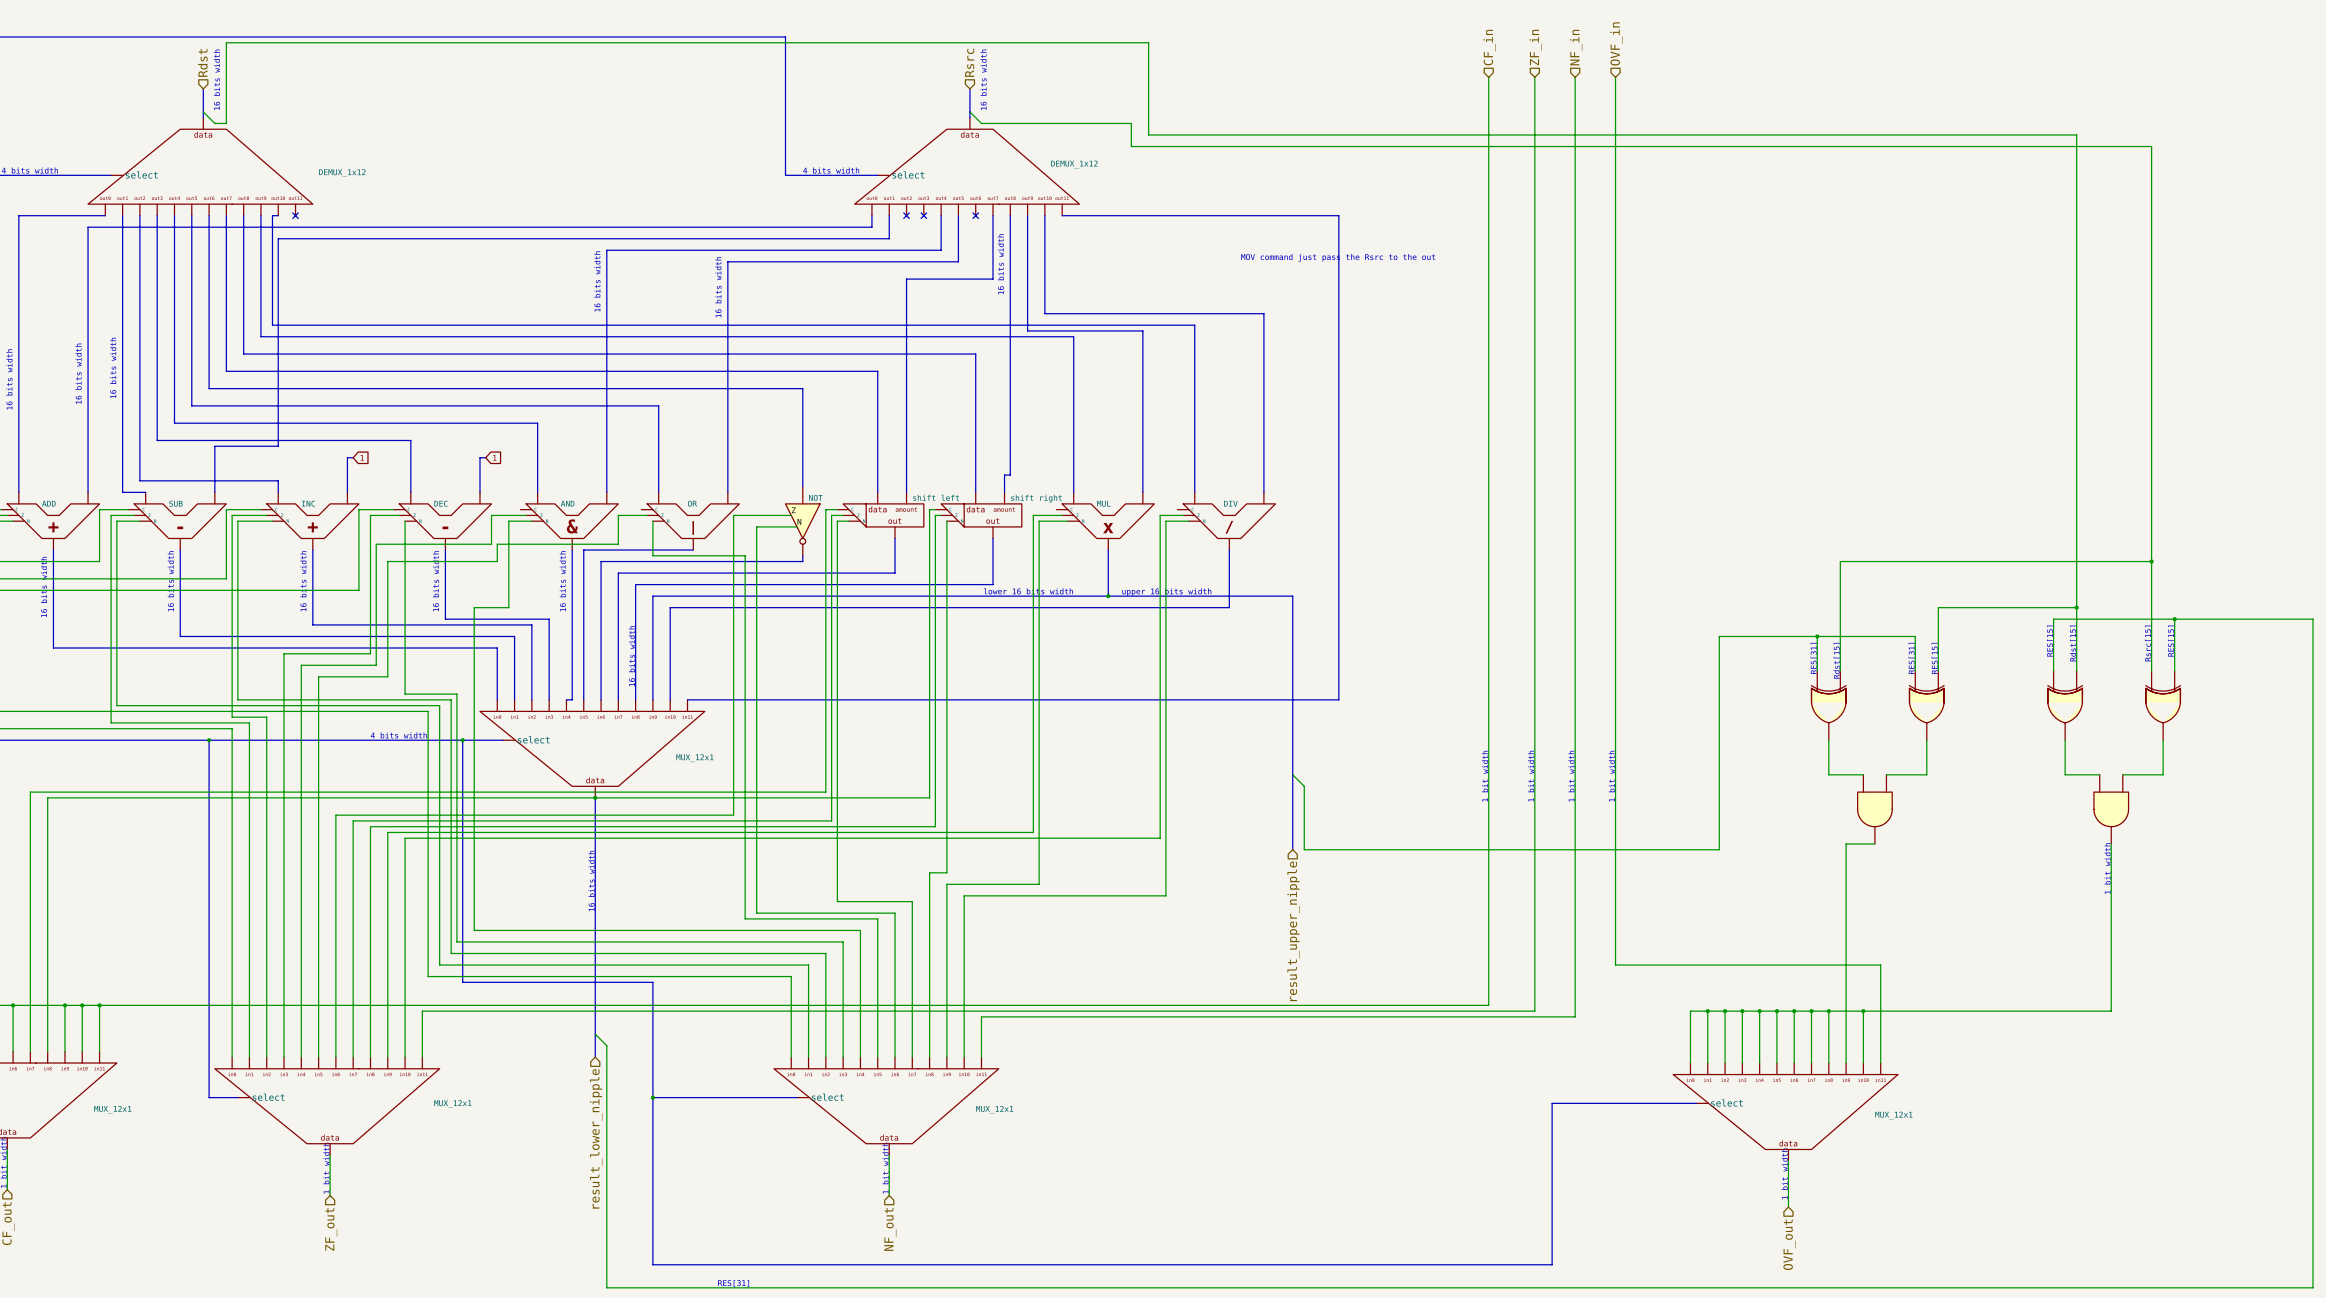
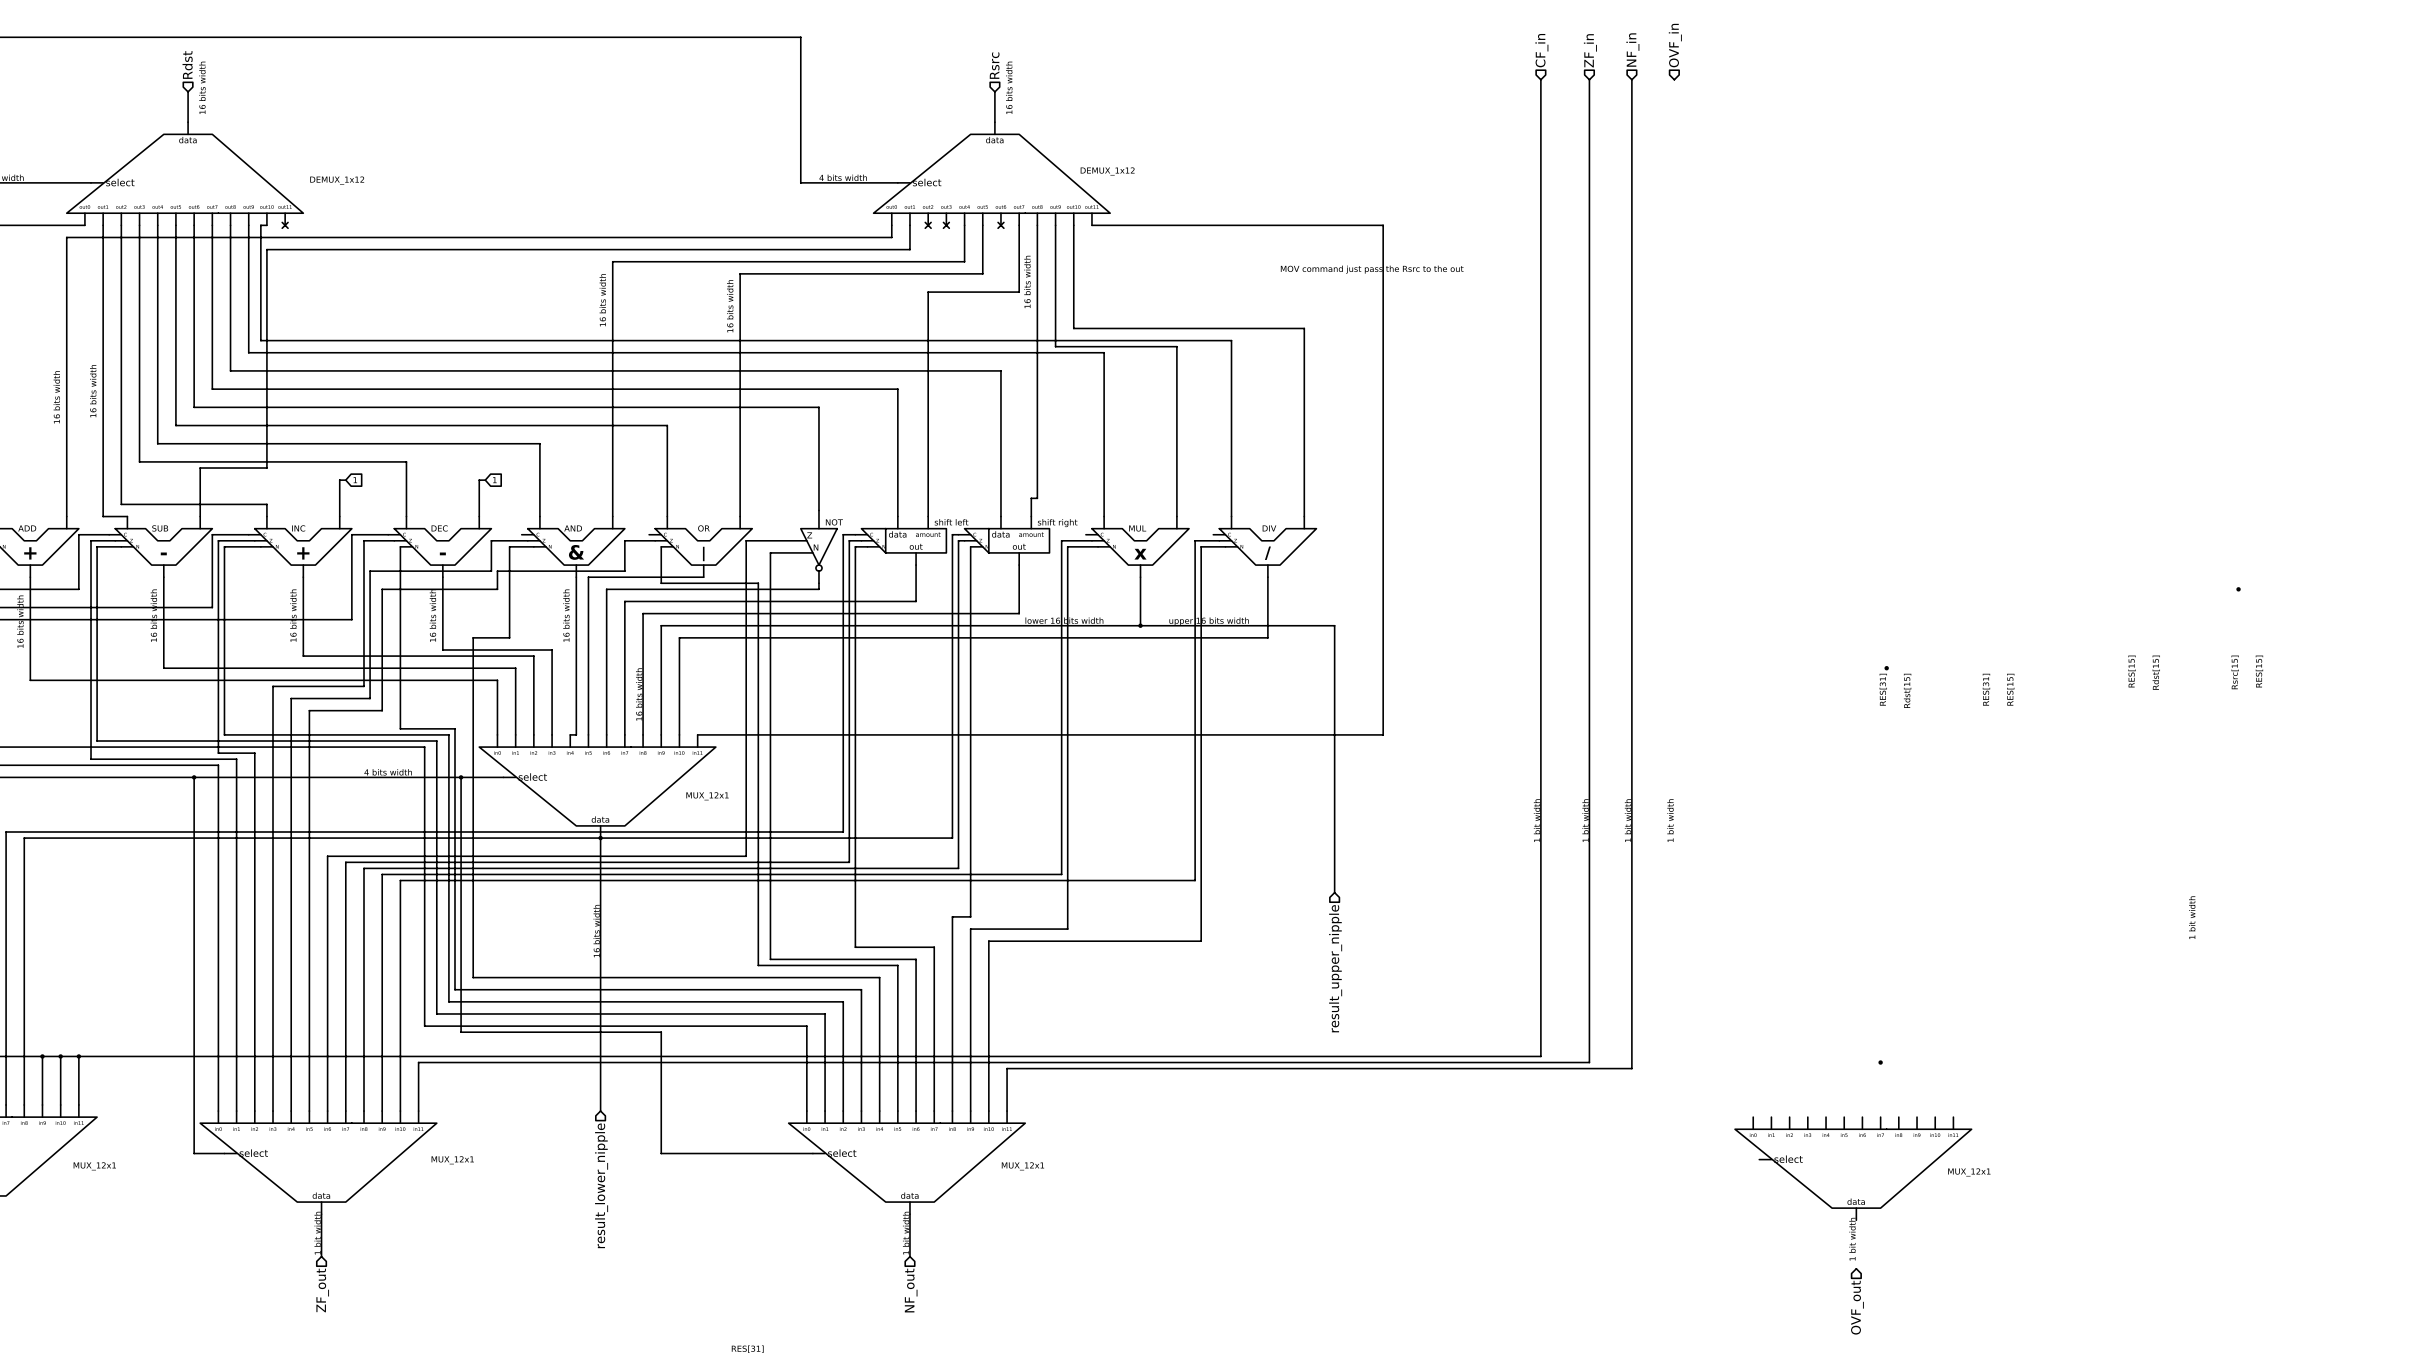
wire: (1615, 77) (1615, 965) (1880, 965) (1880, 1063) -> none
wire: (203, 111) (214, 123) (226, 123) (226, 42) (1148, 42) (1148, 134) (2076, 134) (2076, 671) -> none
wire: (969, 111) (981, 123) (1131, 123) (1131, 146) (2151, 146) (2151, 671) -> none
wire: (2151, 561) (1840, 561) (1840, 671) -> none
wire: (2076, 607) (1938, 607) (1938, 671) -> none
junction: (2076, 607) -> none
wire: (2174, 619) (2174, 671) -> none
junction: (2174, 619) -> none
wire: (1817, 636) (1817, 671) -> none
wire: (1915, 671) (1915, 636) (1719, 636) (1719, 849) (1304, 849) (1304, 786) (1292, 774) -> none
wire: (2053, 671) (2053, 619) (2312, 619) (2312, 1287) (606, 1287) (606, 1045) (595, 1034) -> none
part: (1828, 705) -> none
part: (1926, 705) -> none
part: (2065, 705) -> none
part: (2163, 705) -> none
wire: (1828, 740) (1828, 774) (1863, 774) -> none
wire: (1926, 740) (1926, 774) (1886, 774) -> none
wire: (2065, 740) (2065, 774) (2099, 774) -> none
wire: (2163, 740) (2163, 774) (2122, 774) -> none
part: (1874, 809) -> none
part: (2111, 809) -> none
wire: (1874, 843) (1846, 843) (1846, 1063) -> none
wire: (2111, 843) (2111, 1011) (1690, 1011) (1690, 1063) -> none
wire: (1707, 1011) (1707, 1063) -> none
junction: (1707, 1011) -> none
wire: (1725, 1011) (1725, 1063) -> none
junction: (1725, 1011) -> none
wire: (1742, 1011) (1742, 1063) -> none
junction: (1742, 1011) -> none
wire: (1759, 1011) (1759, 1063) -> none
junction: (1759, 1011) -> none
wire: (1776, 1011) (1776, 1063) -> none
junction: (1776, 1011) -> none
wire: (1794, 1011) (1794, 1063) -> none
junction: (1794, 1011) -> none
wire: (1811, 1011) (1811, 1063) -> none
wire: (1828, 1011) (1828, 1063) -> none
junction: (1828, 1011) -> none
wire: (1863, 1011) (1863, 1063) -> none
junction: (1863, 1011) -> none
bus: (652, 1097) (652, 1264) (1552, 1264) (1552, 1103) (1696, 1103) -> none
junction: (652, 1097) -> none
wire: (1788, 1161) (1788, 1207) -> none

